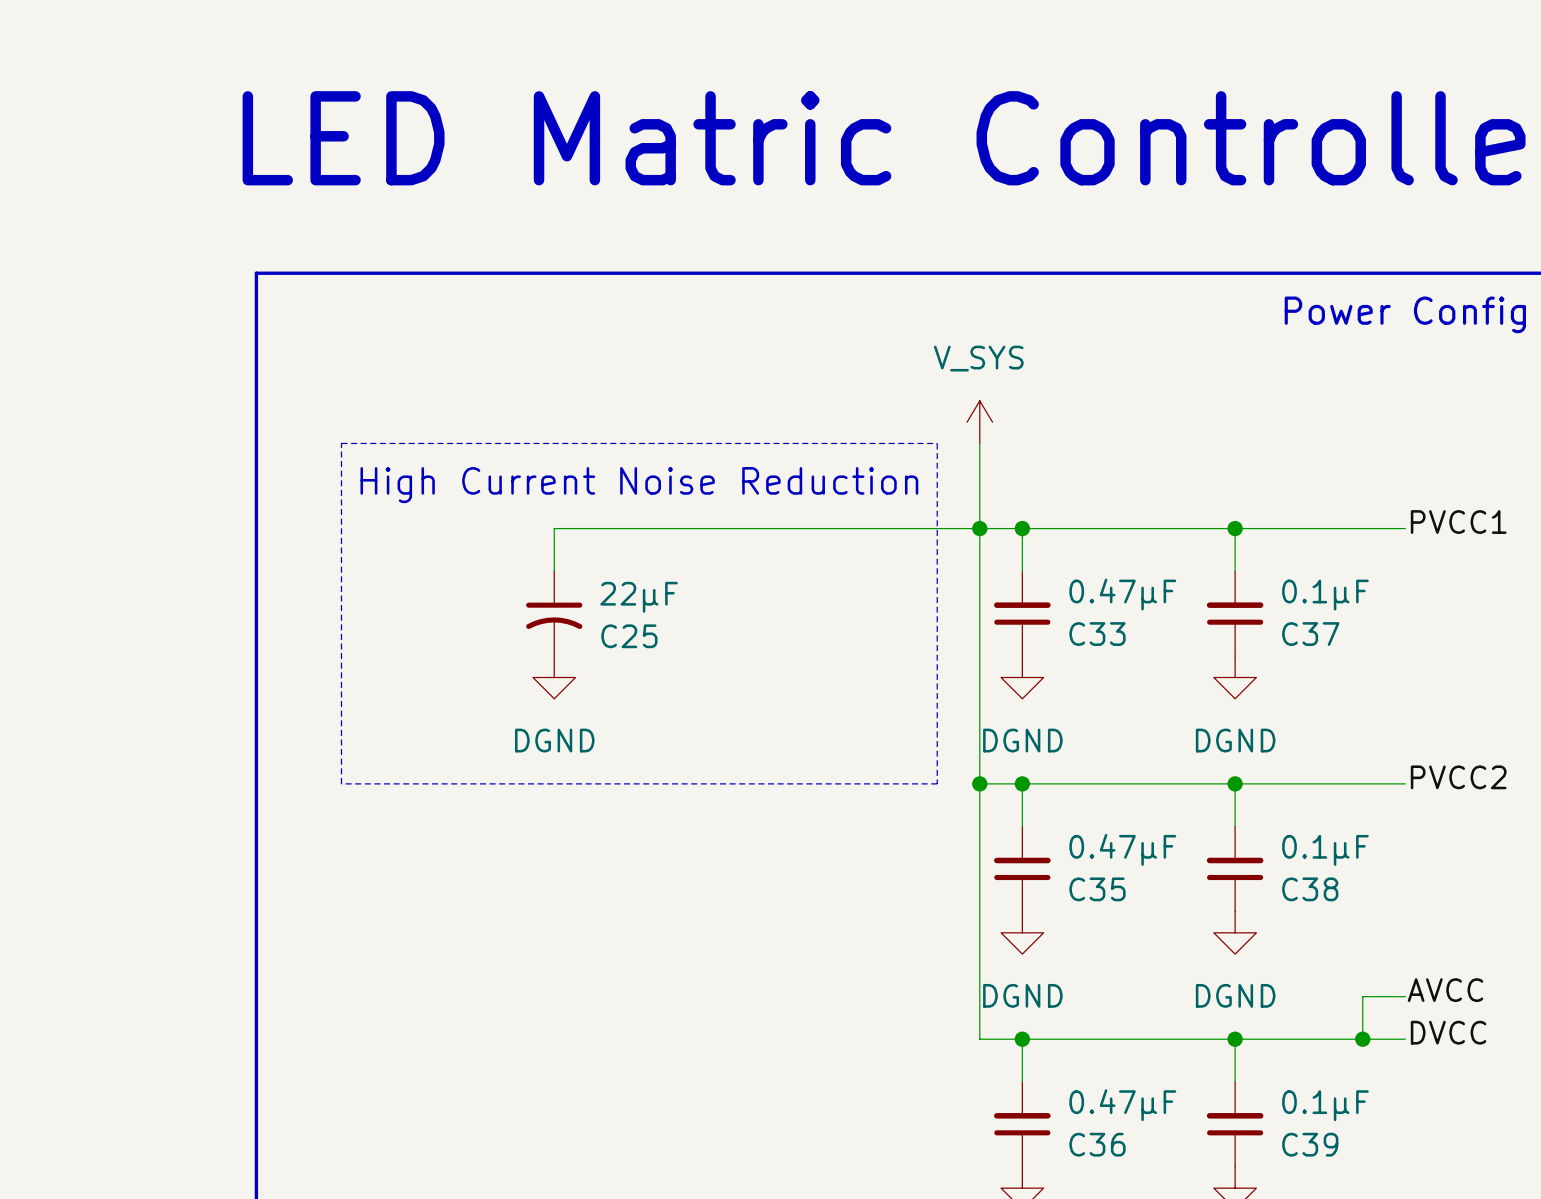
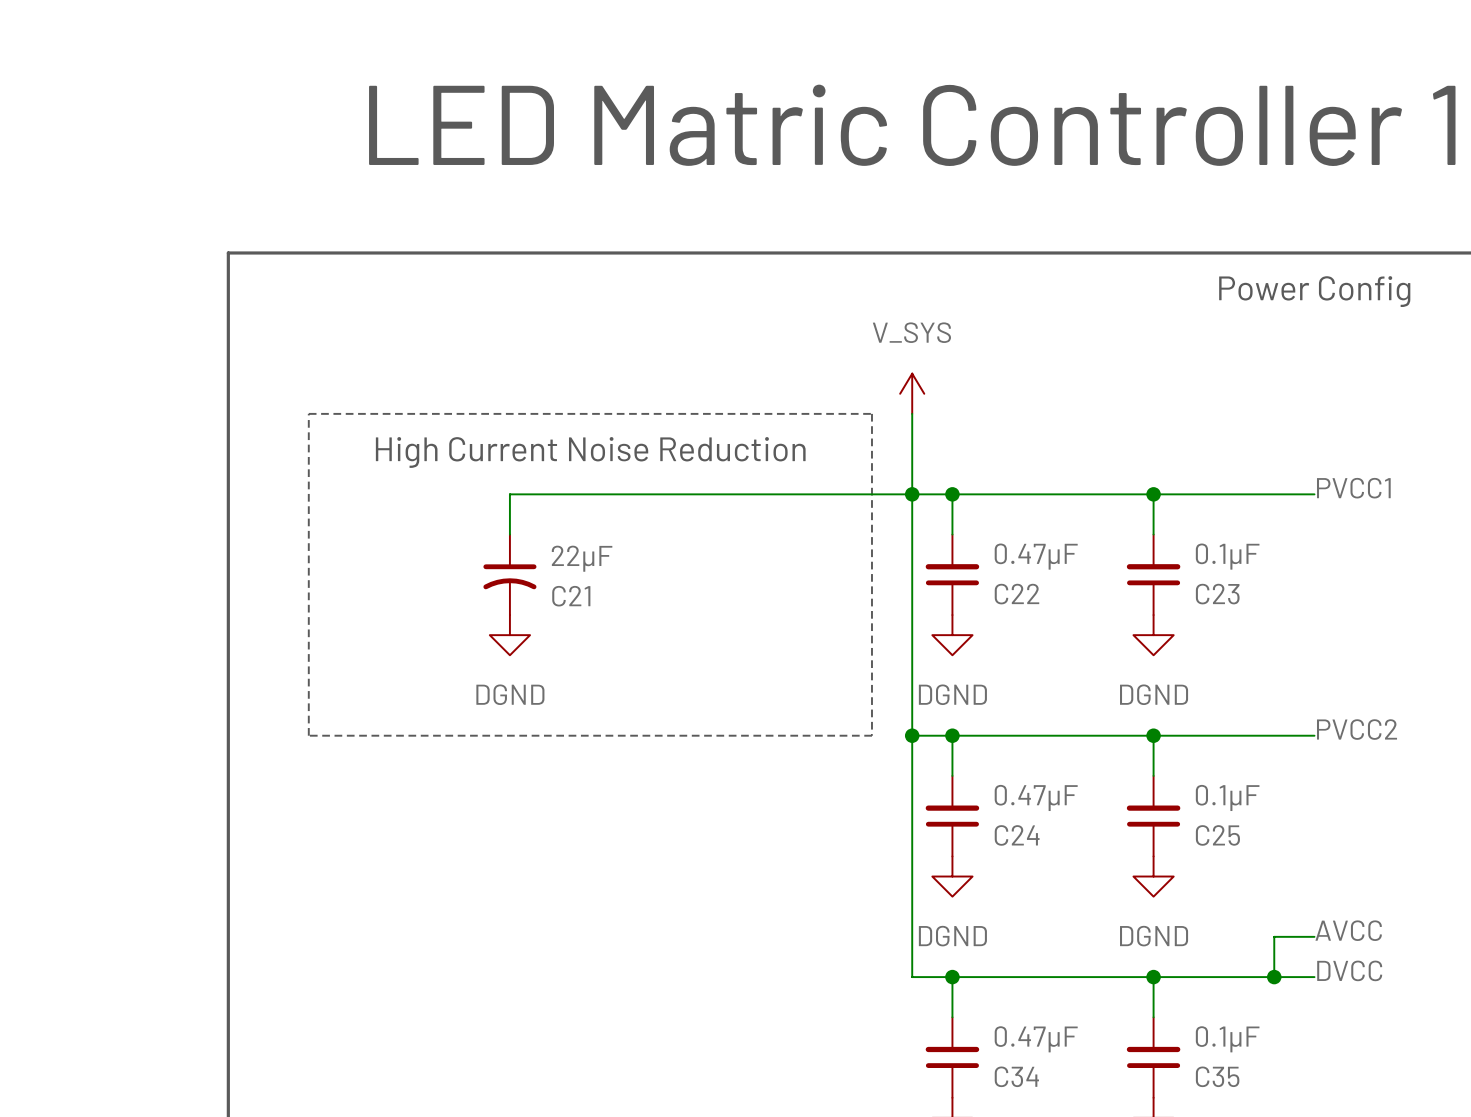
C33 name: C33 (1097, 634) -> C22 (1016, 594)
C37 name: C37 (1310, 634) -> C23 (1217, 594)
C25 name: C25 (629, 636) -> C21 (571, 596)
C35 name: C35 (1097, 889) -> C24 (1017, 835)
C38 name: C38 (1310, 889) -> C25 (1217, 835)
C36 name: C36 (1097, 1144) -> C34 (1016, 1076)
C39 name: C39 (1310, 1144) -> C35 (1217, 1076)

